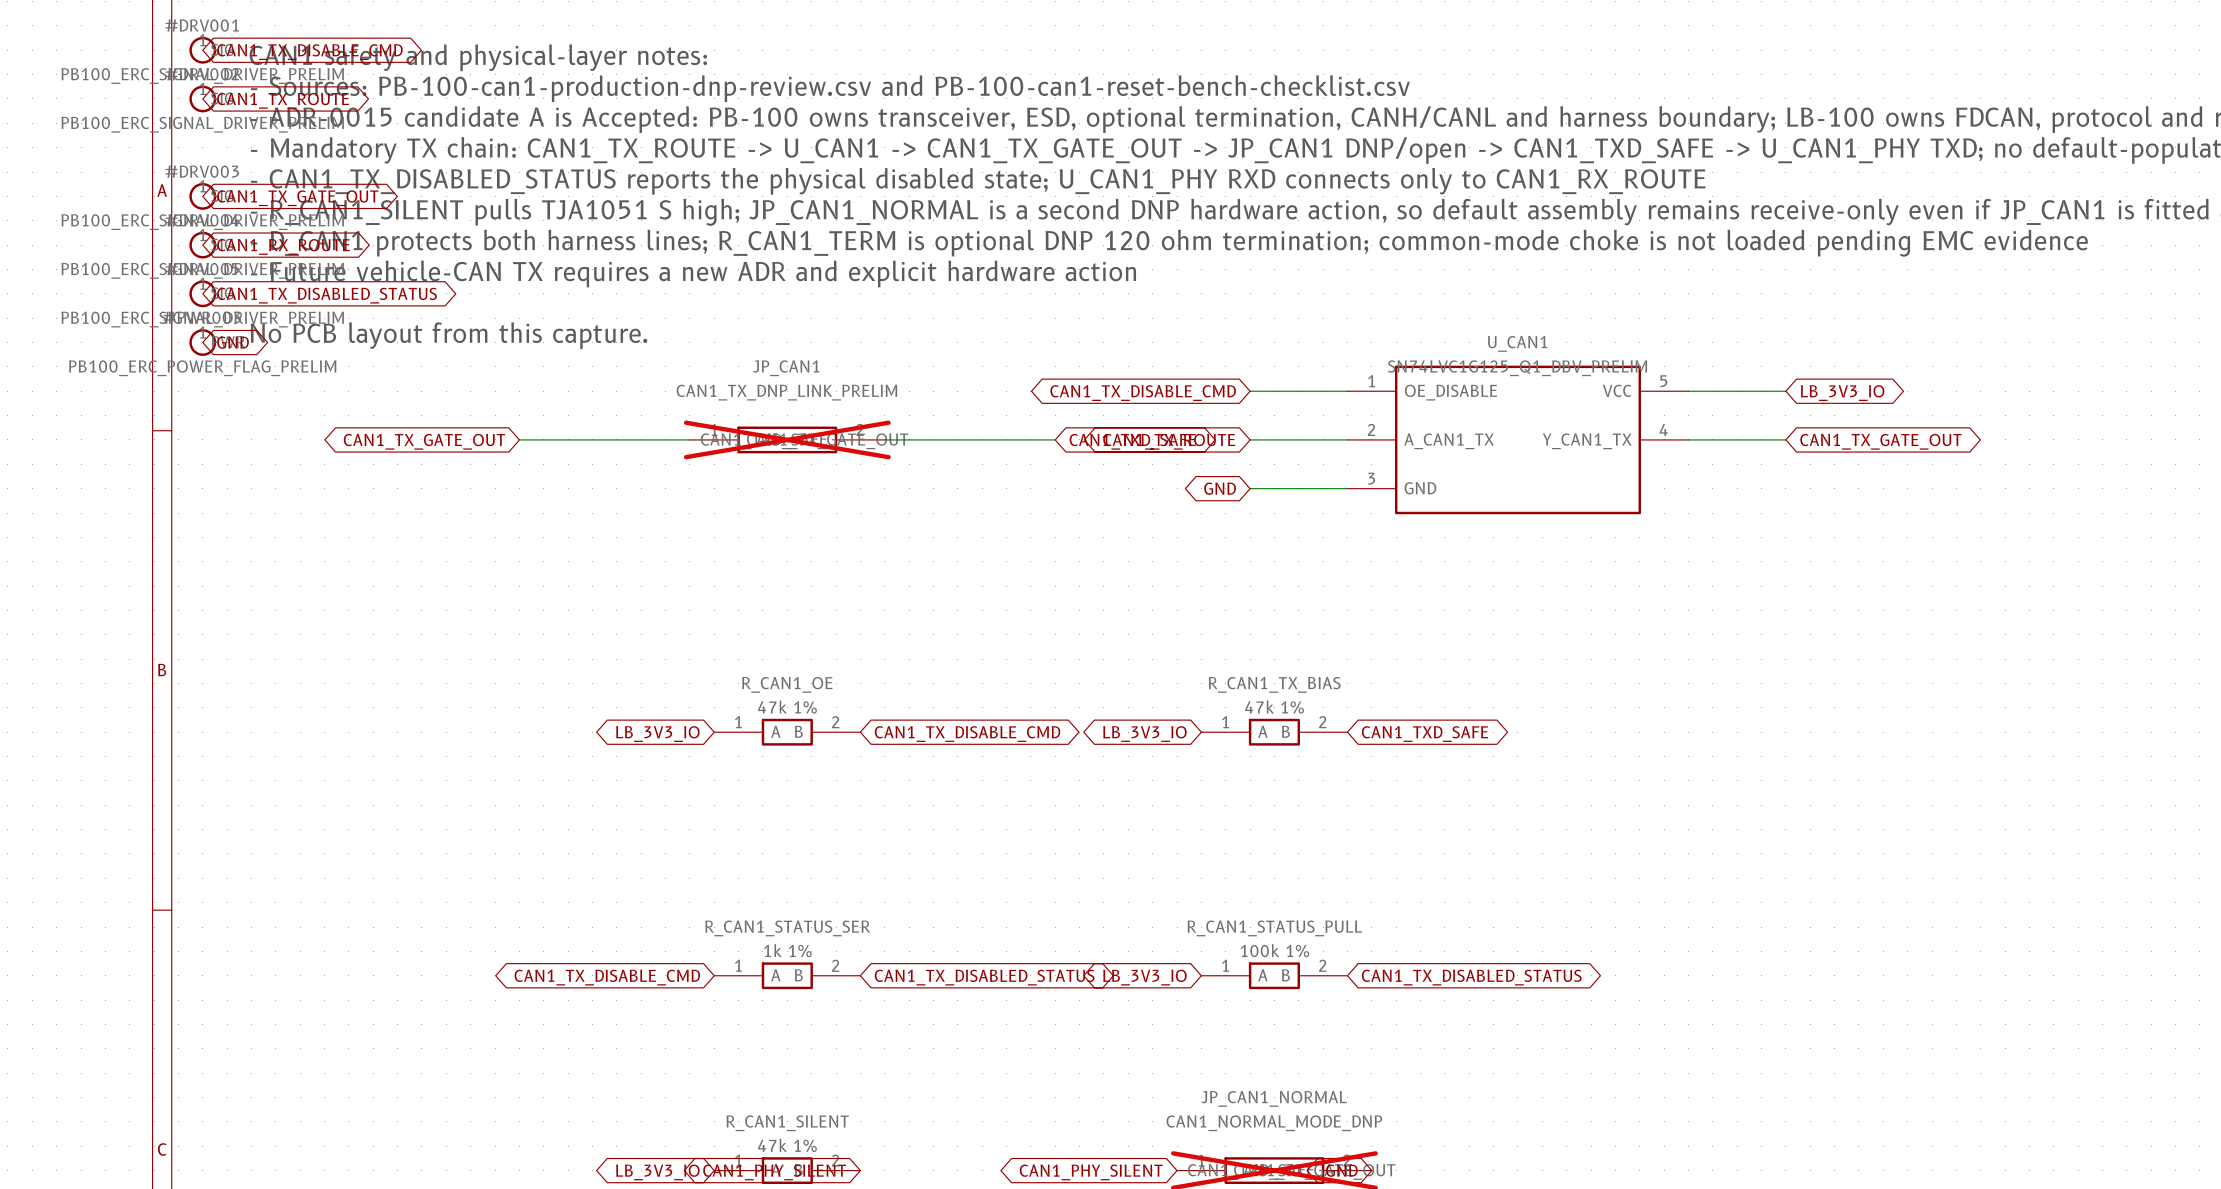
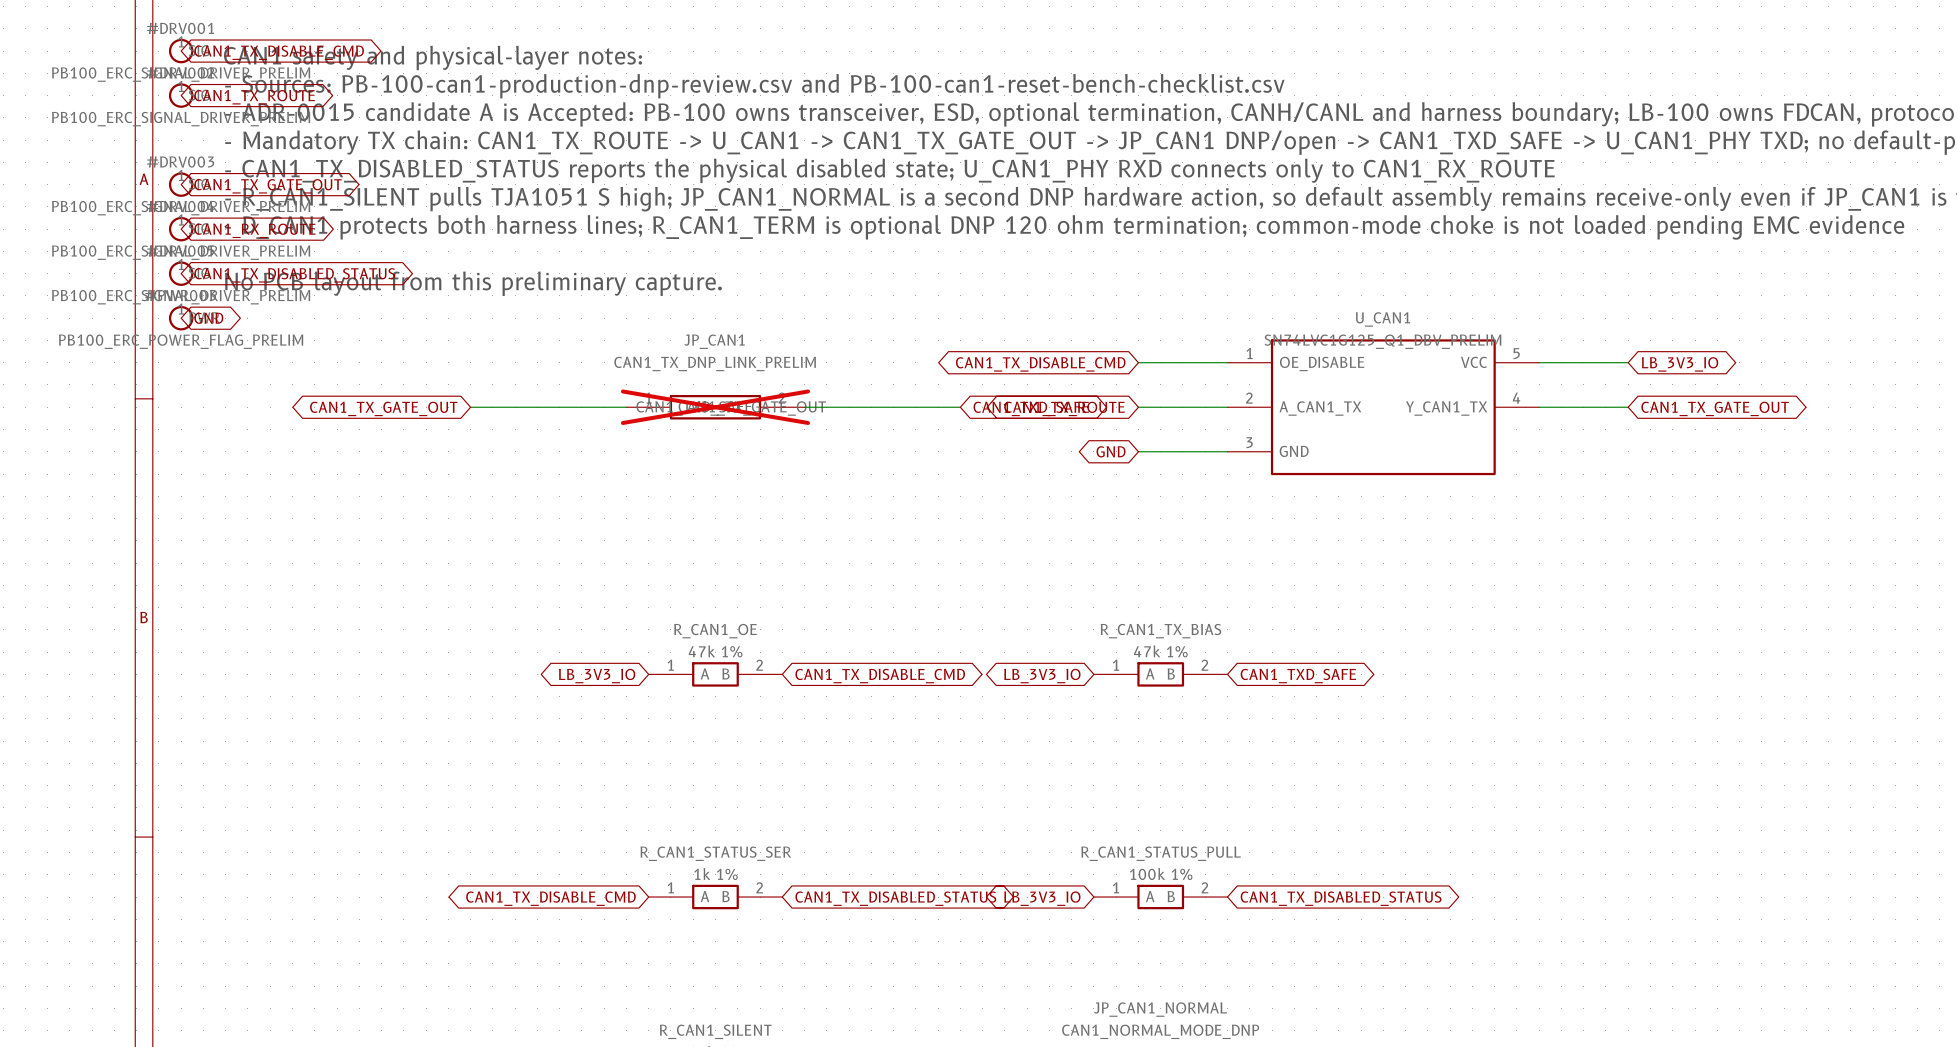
text: - Future vehicle-CAN TX requires a new ADR and explicit hardware action (693, 273) -> none
text: No PCB layout from this capture. (448, 335) -> No PCB layout from this preliminary capture. (473, 283)

